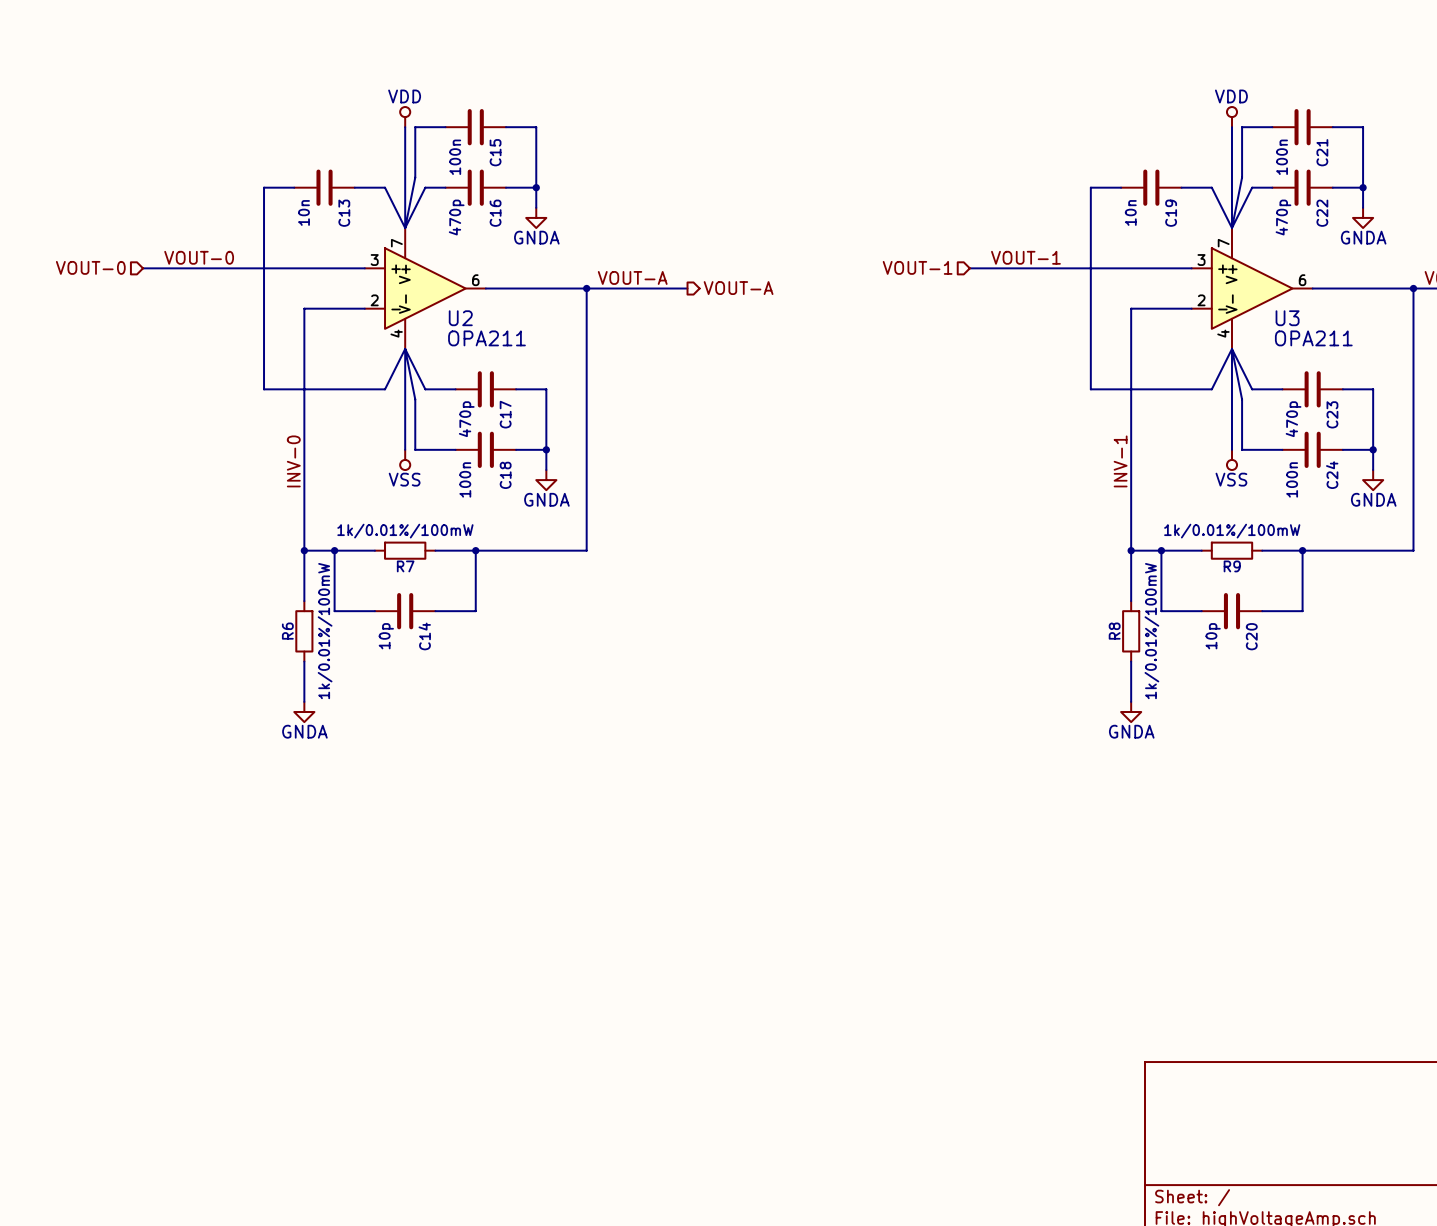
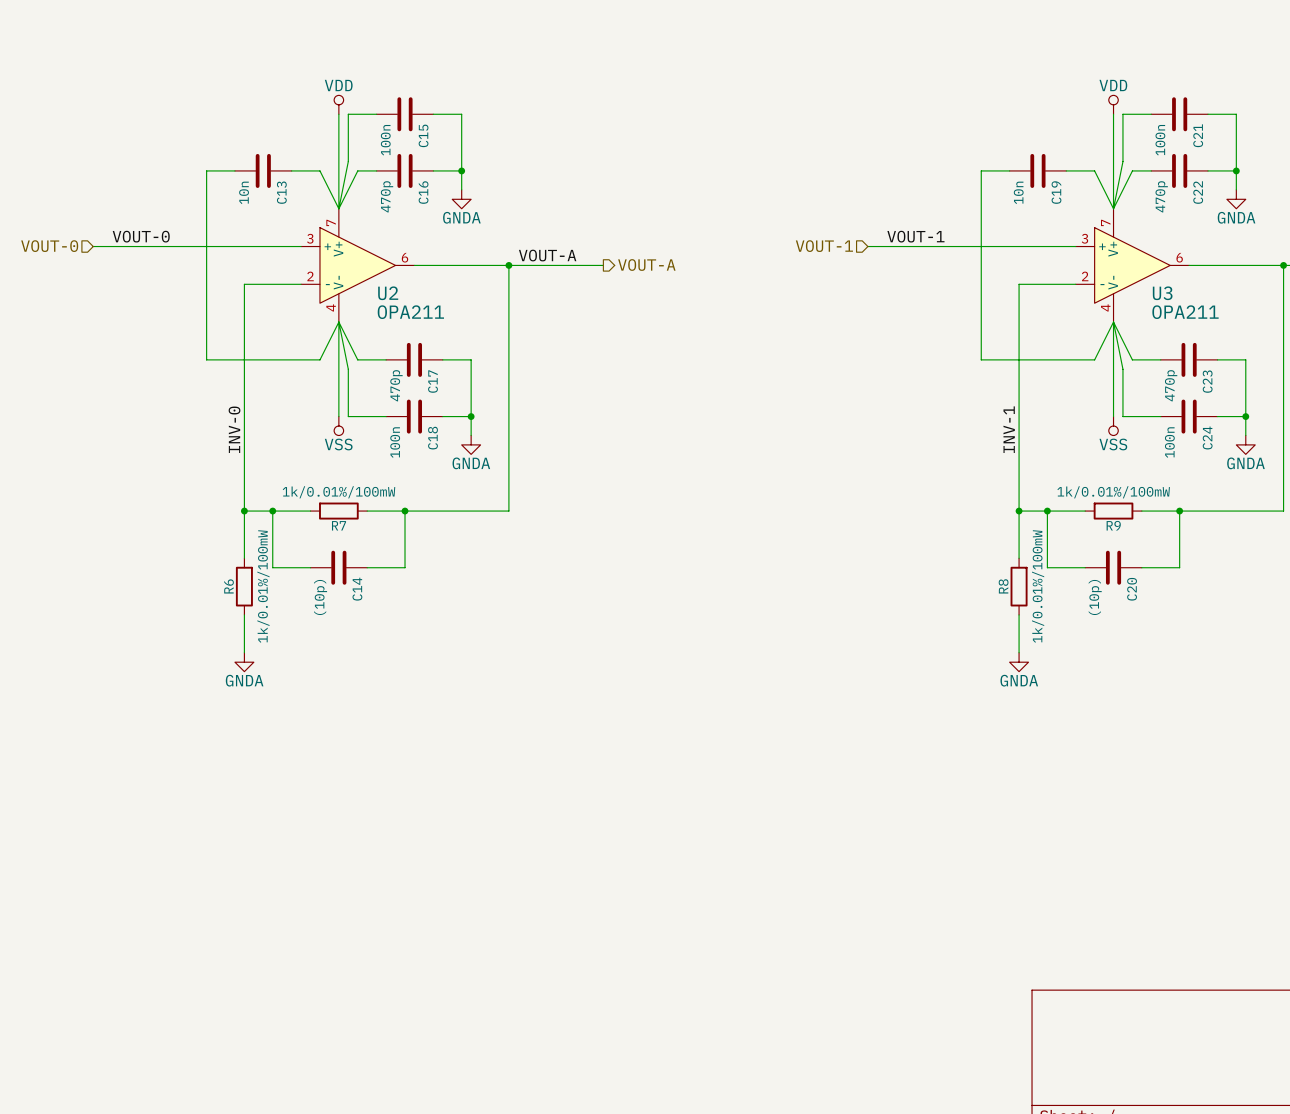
C14 value: 10p (386, 636) -> (10p) (320, 597)
C20 value: 10p (1213, 636) -> (10p) (1095, 597)

